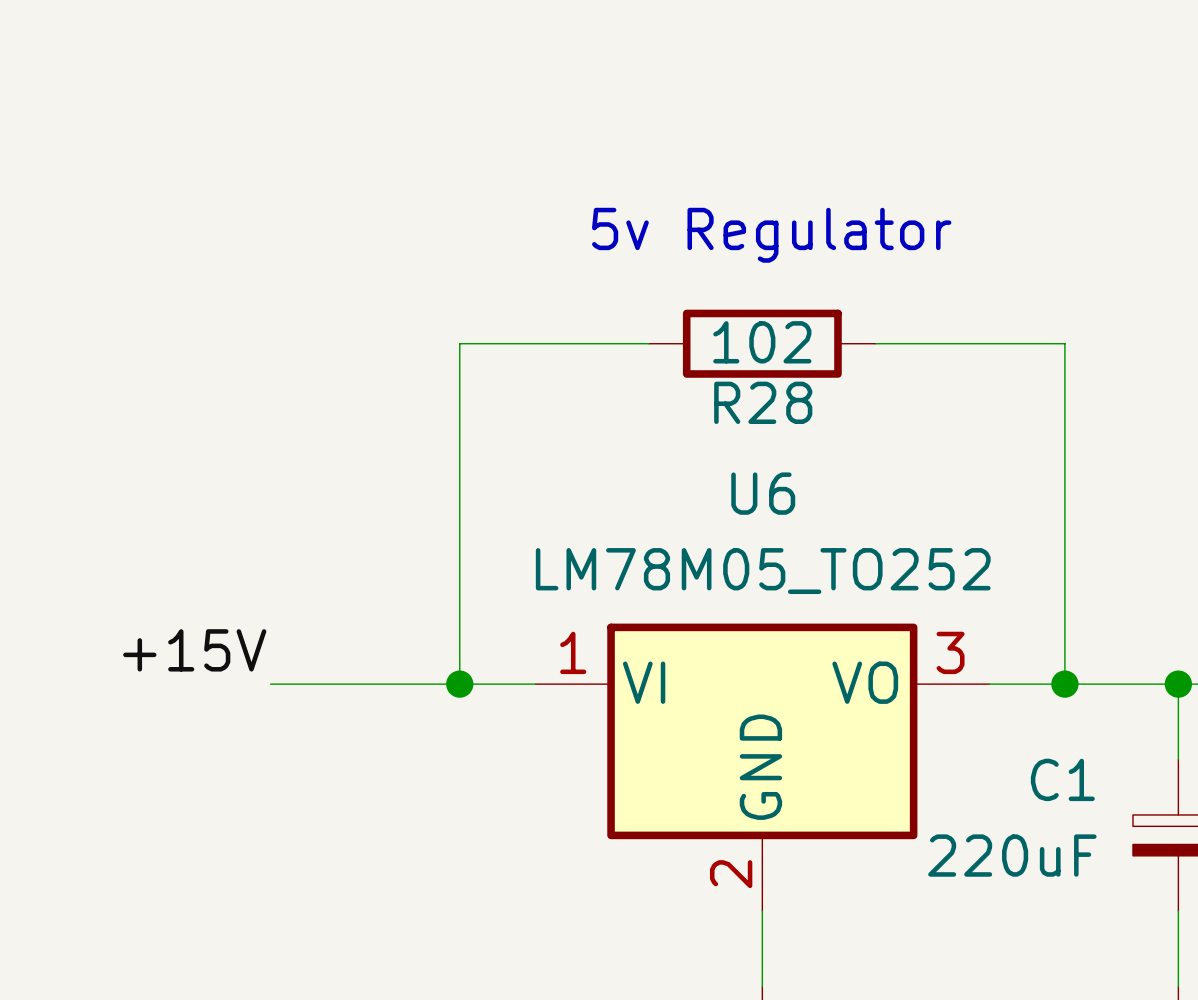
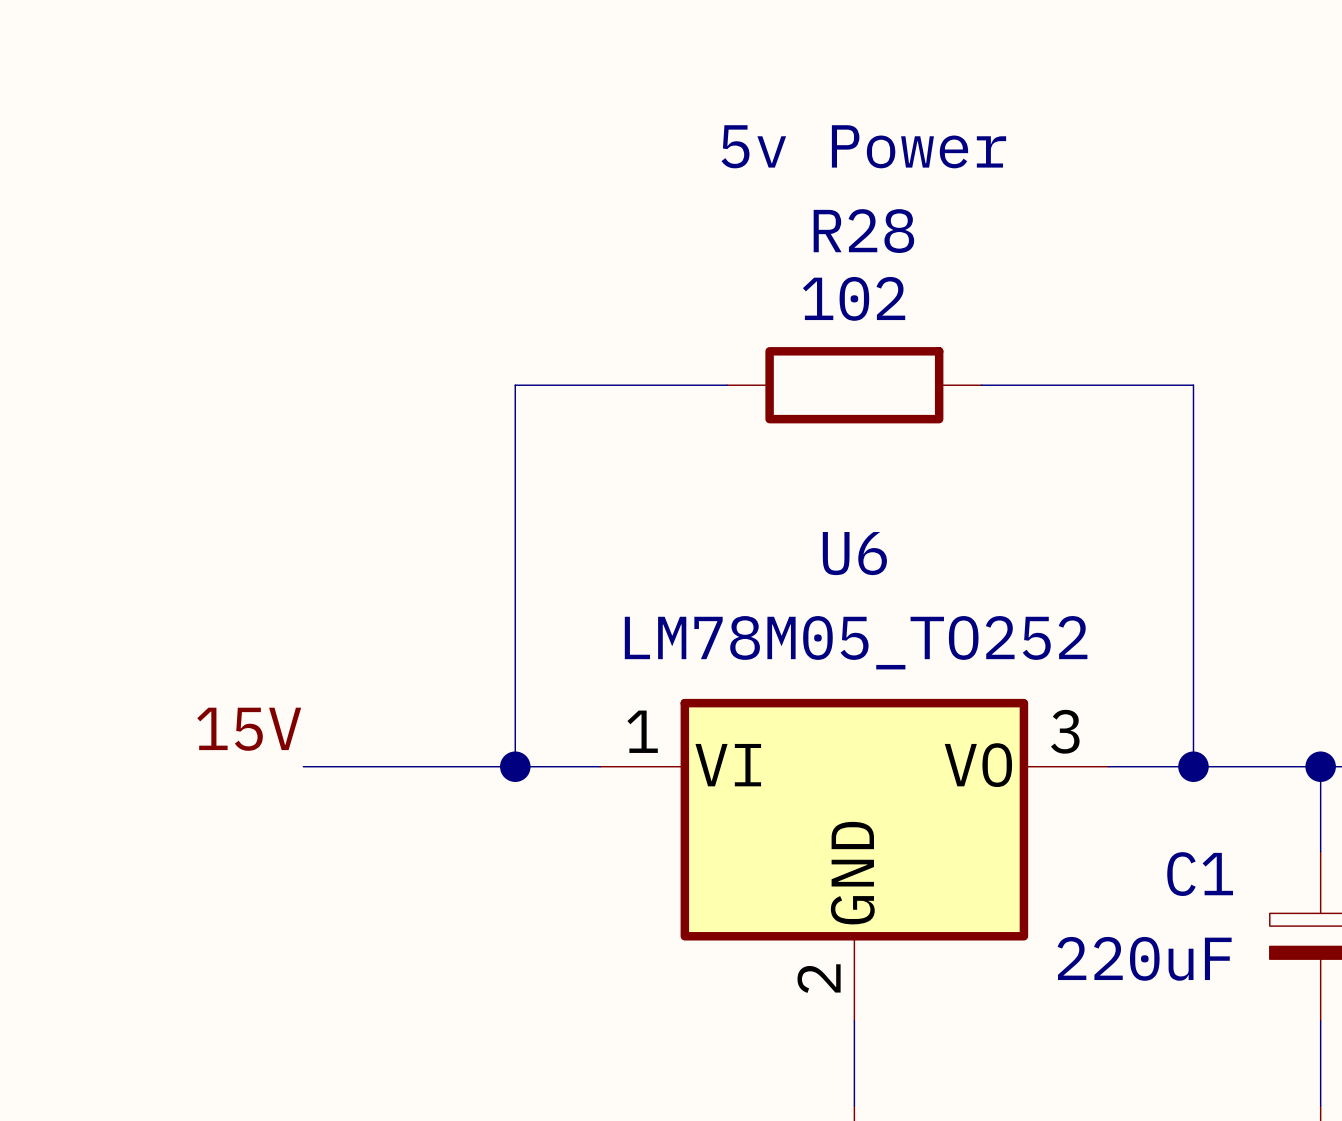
text: none -> 5v Power (863, 146)
text: 5v Regulator (771, 235) -> none
R28 value position: 102 (762, 342) -> 102 (854, 298)
R28 name position: R28 (763, 402) -> R28 (863, 231)
label: +15V (194, 650) -> 15V (249, 729)

